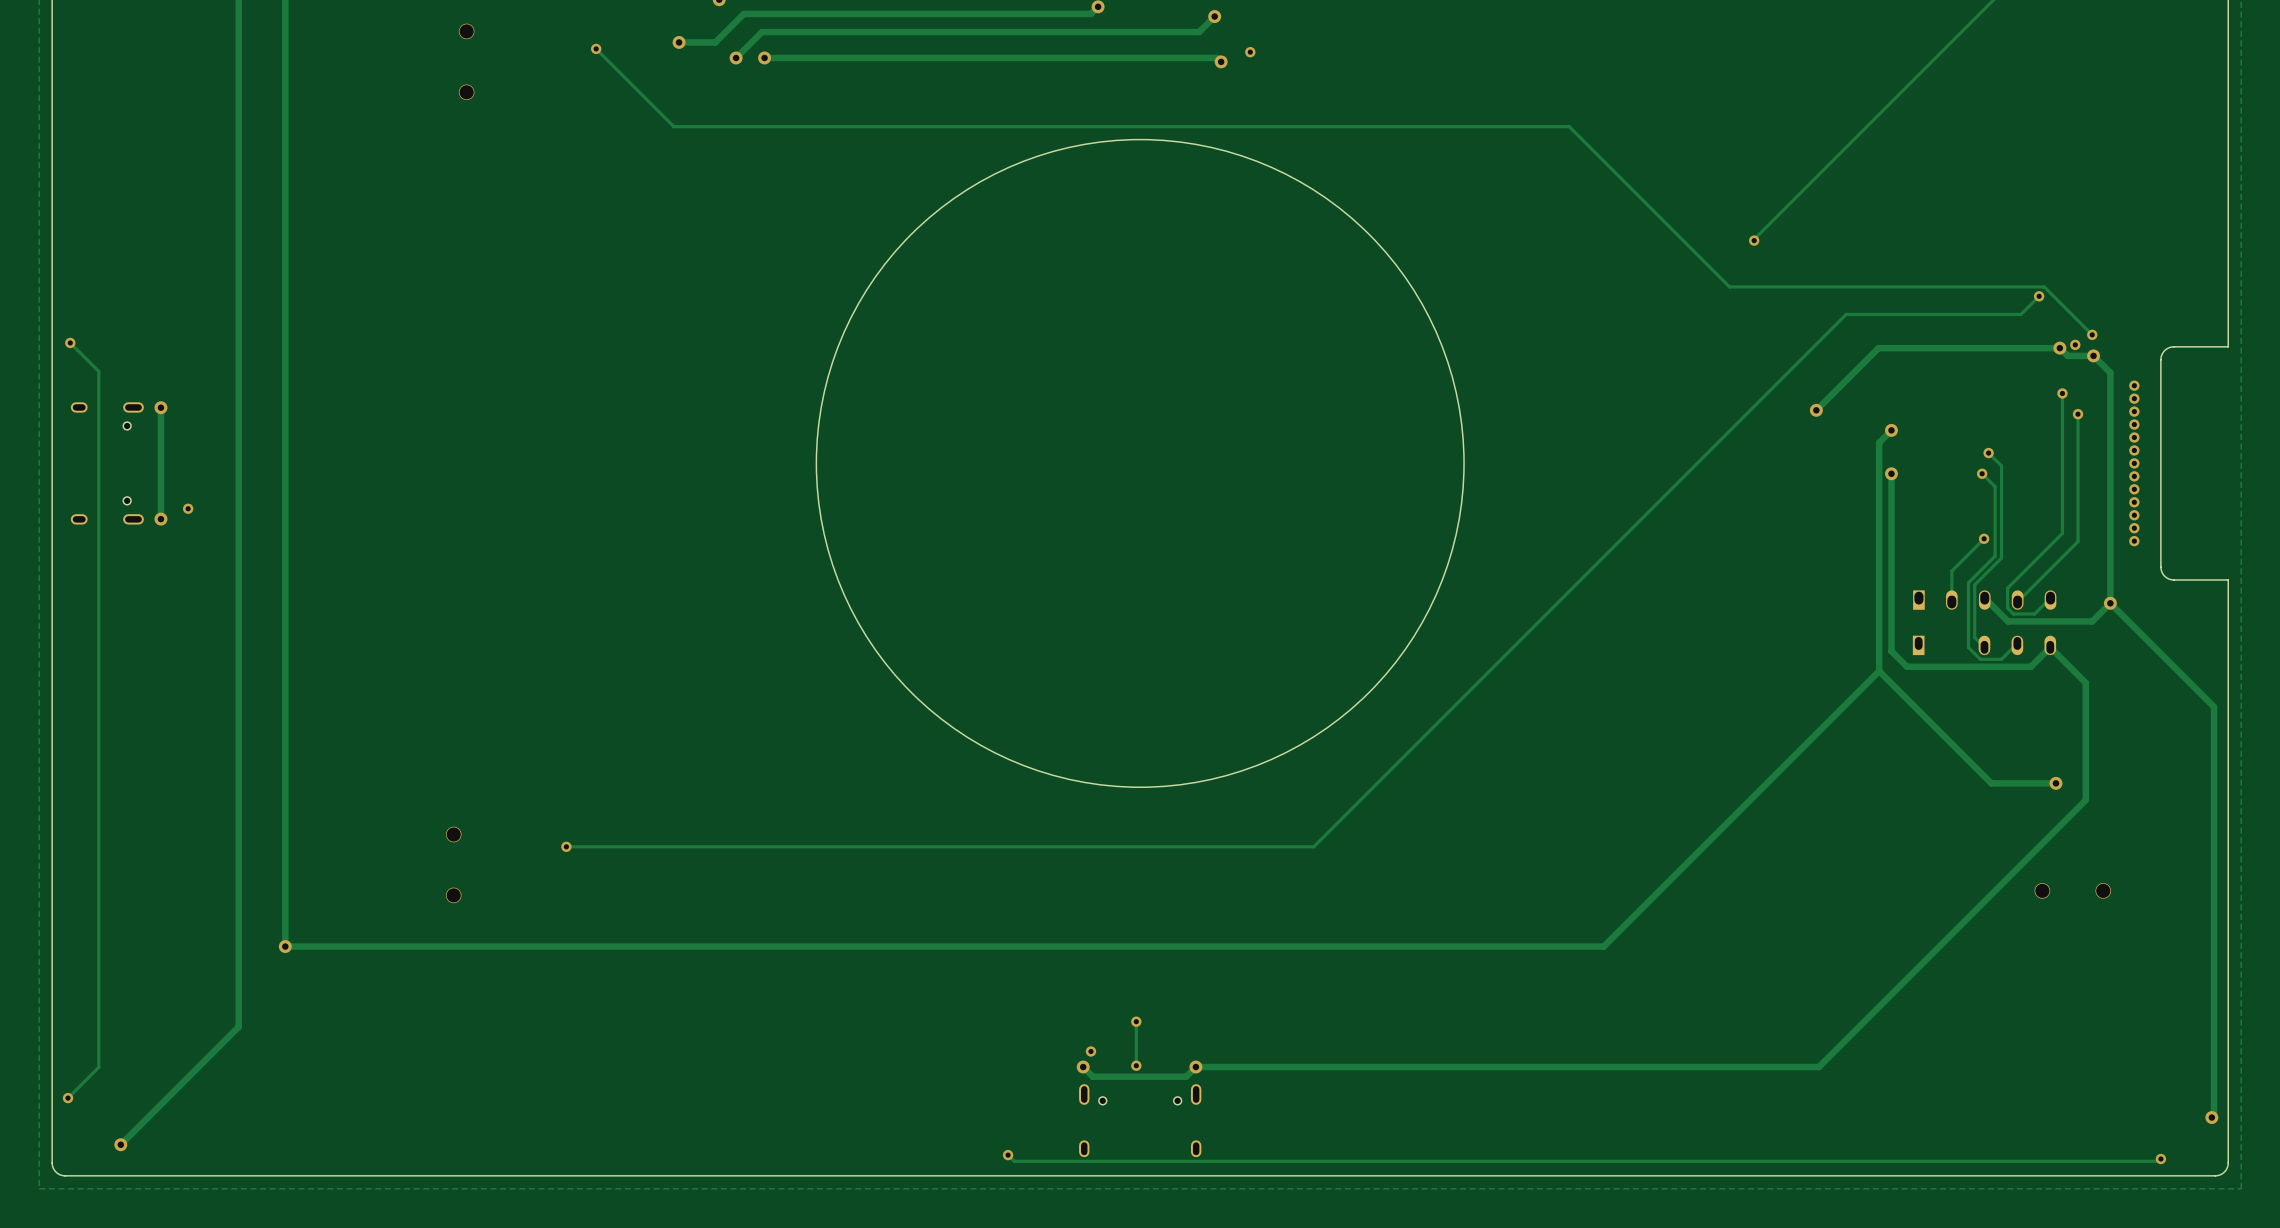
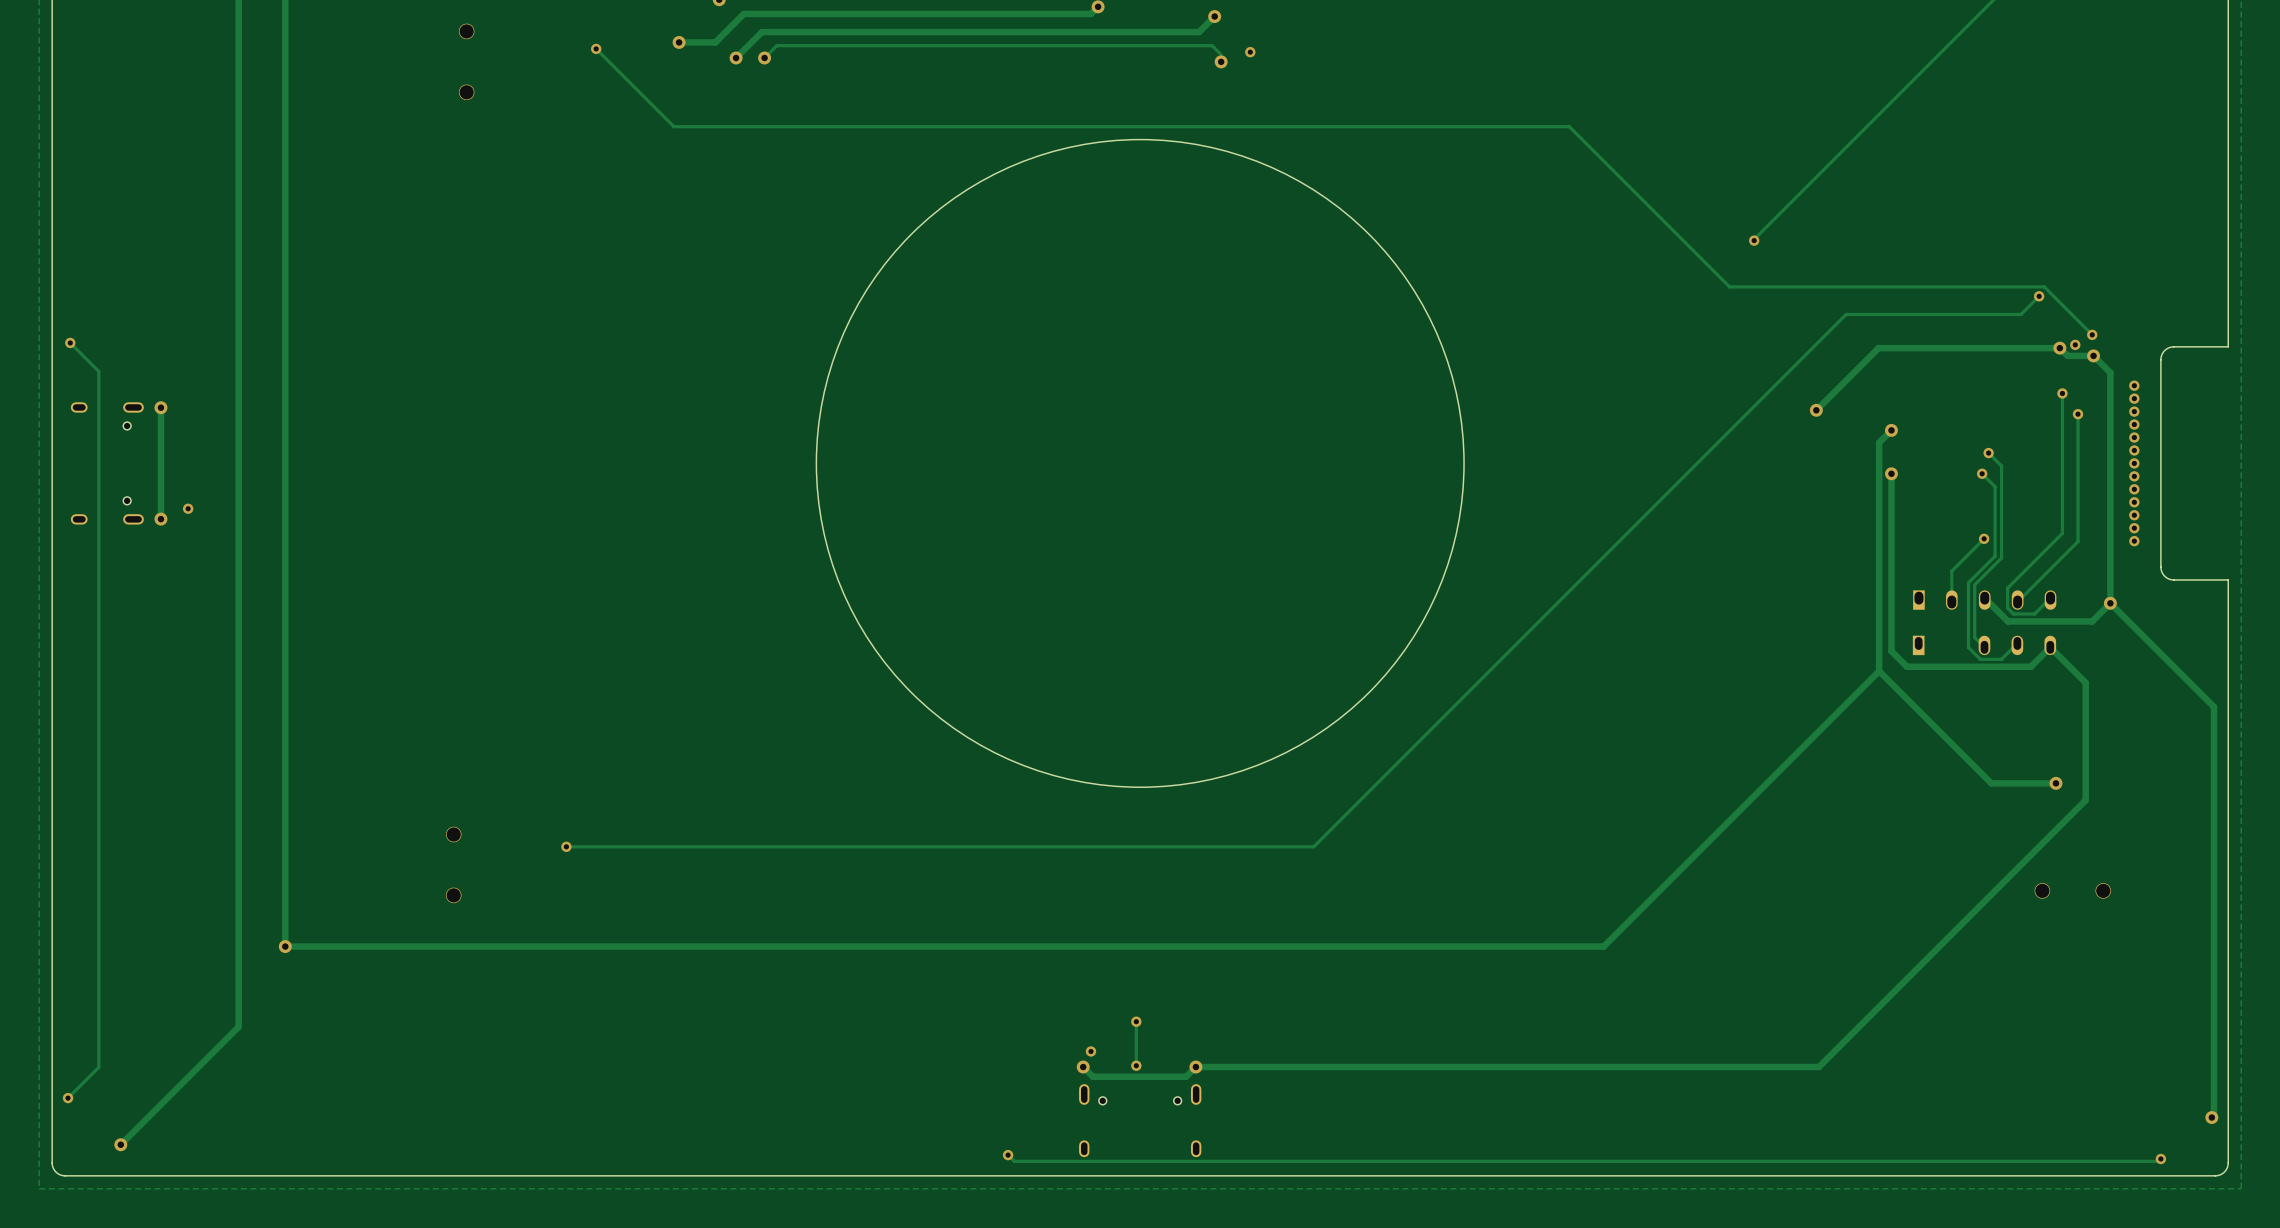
track: (764, 57) (1217, 57) (1221, 61) -> (764, 57) (776, 45) (1212, 45) (1221, 54)

